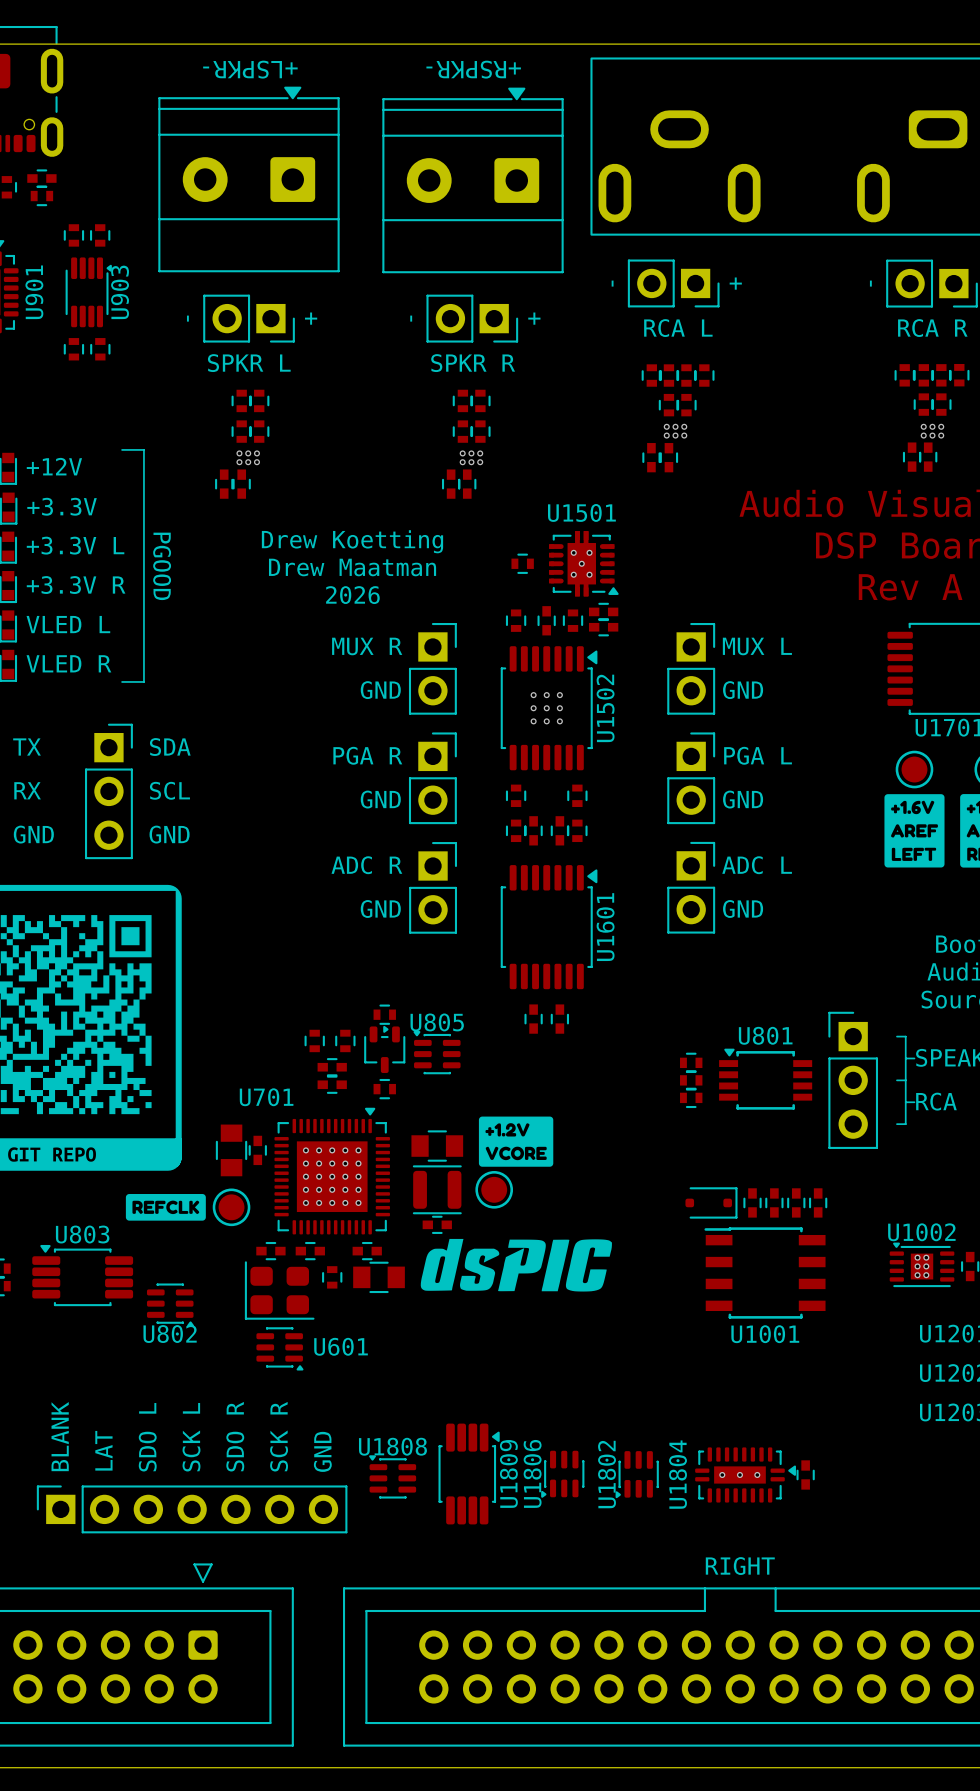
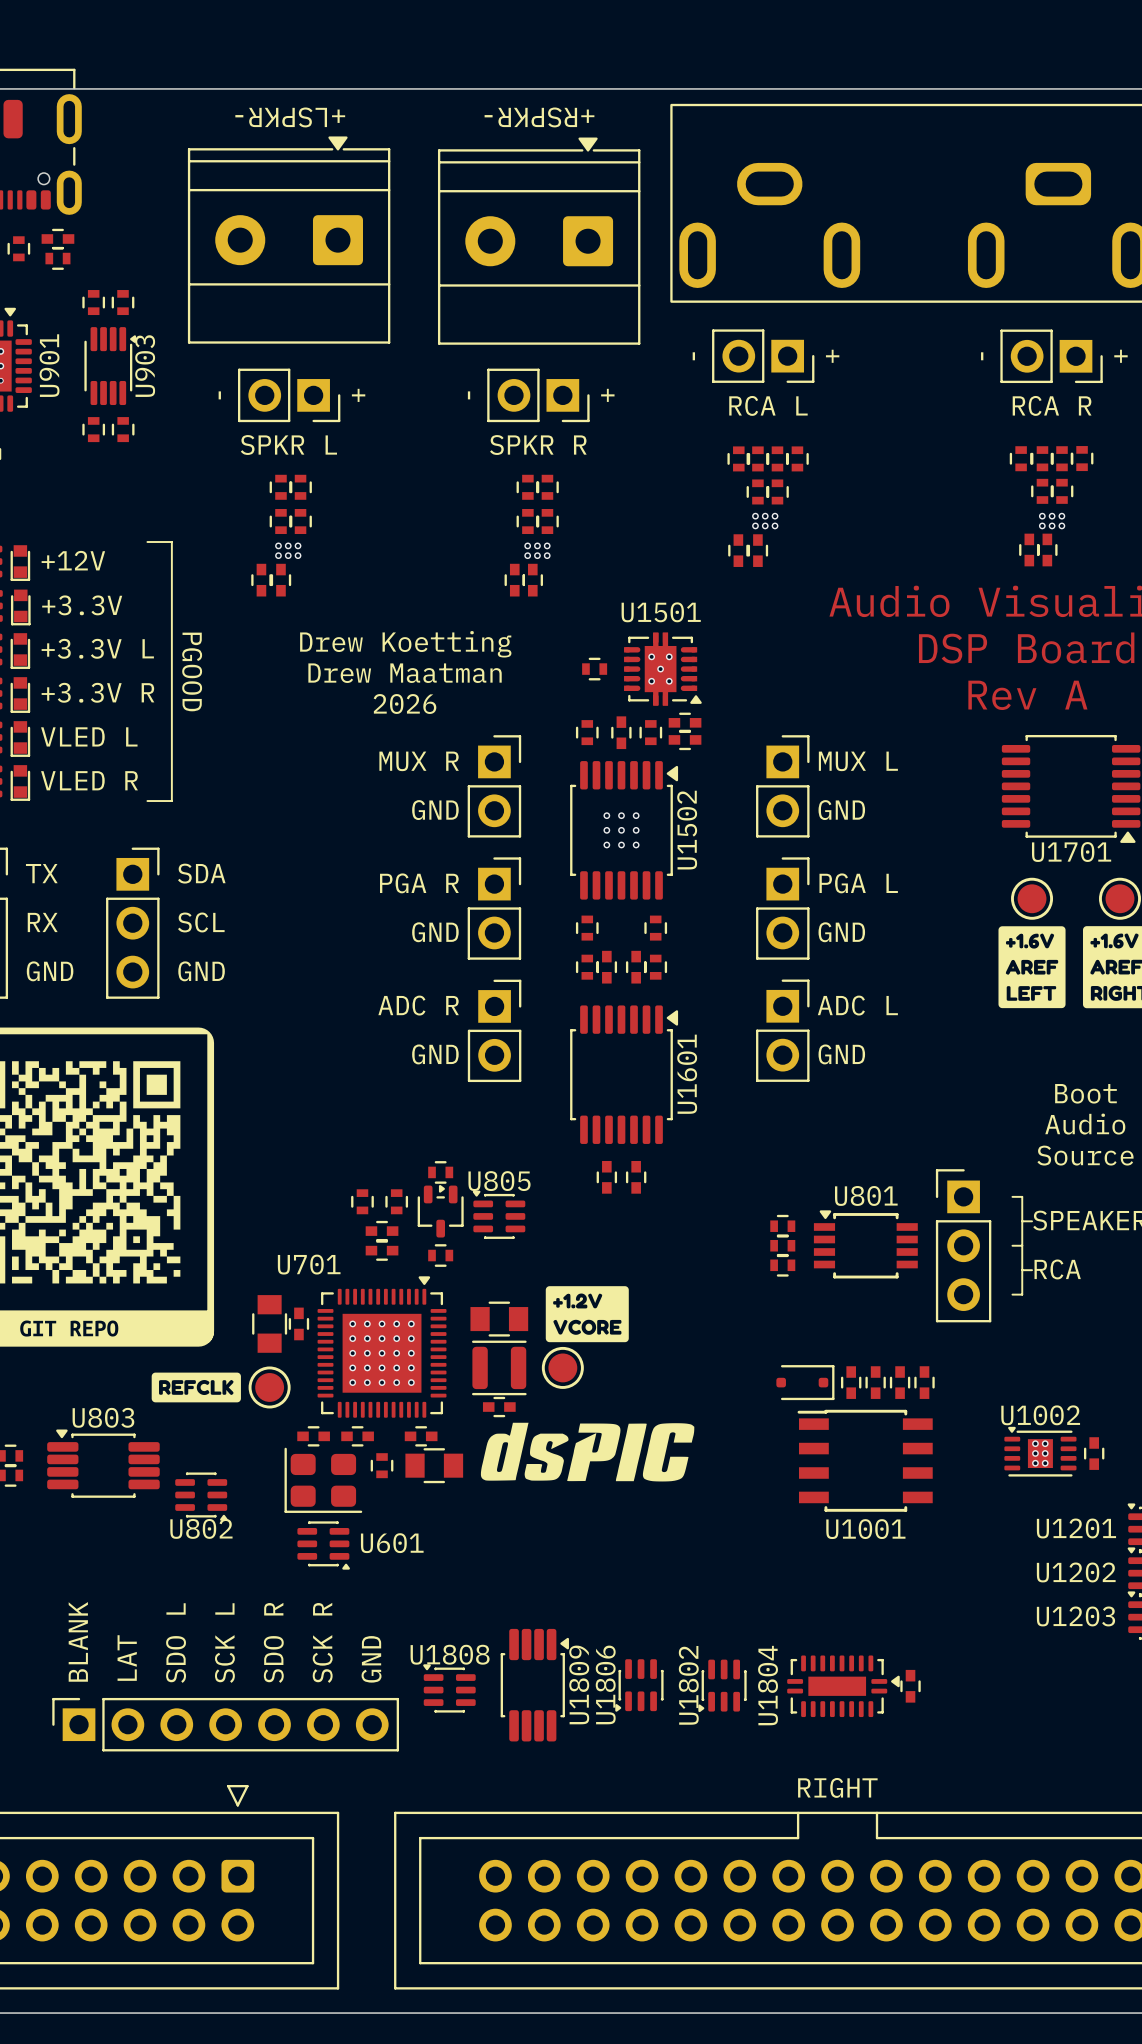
via: (722, 1474) -> none
via: (739, 1474) -> none
via: (757, 1474) -> none

